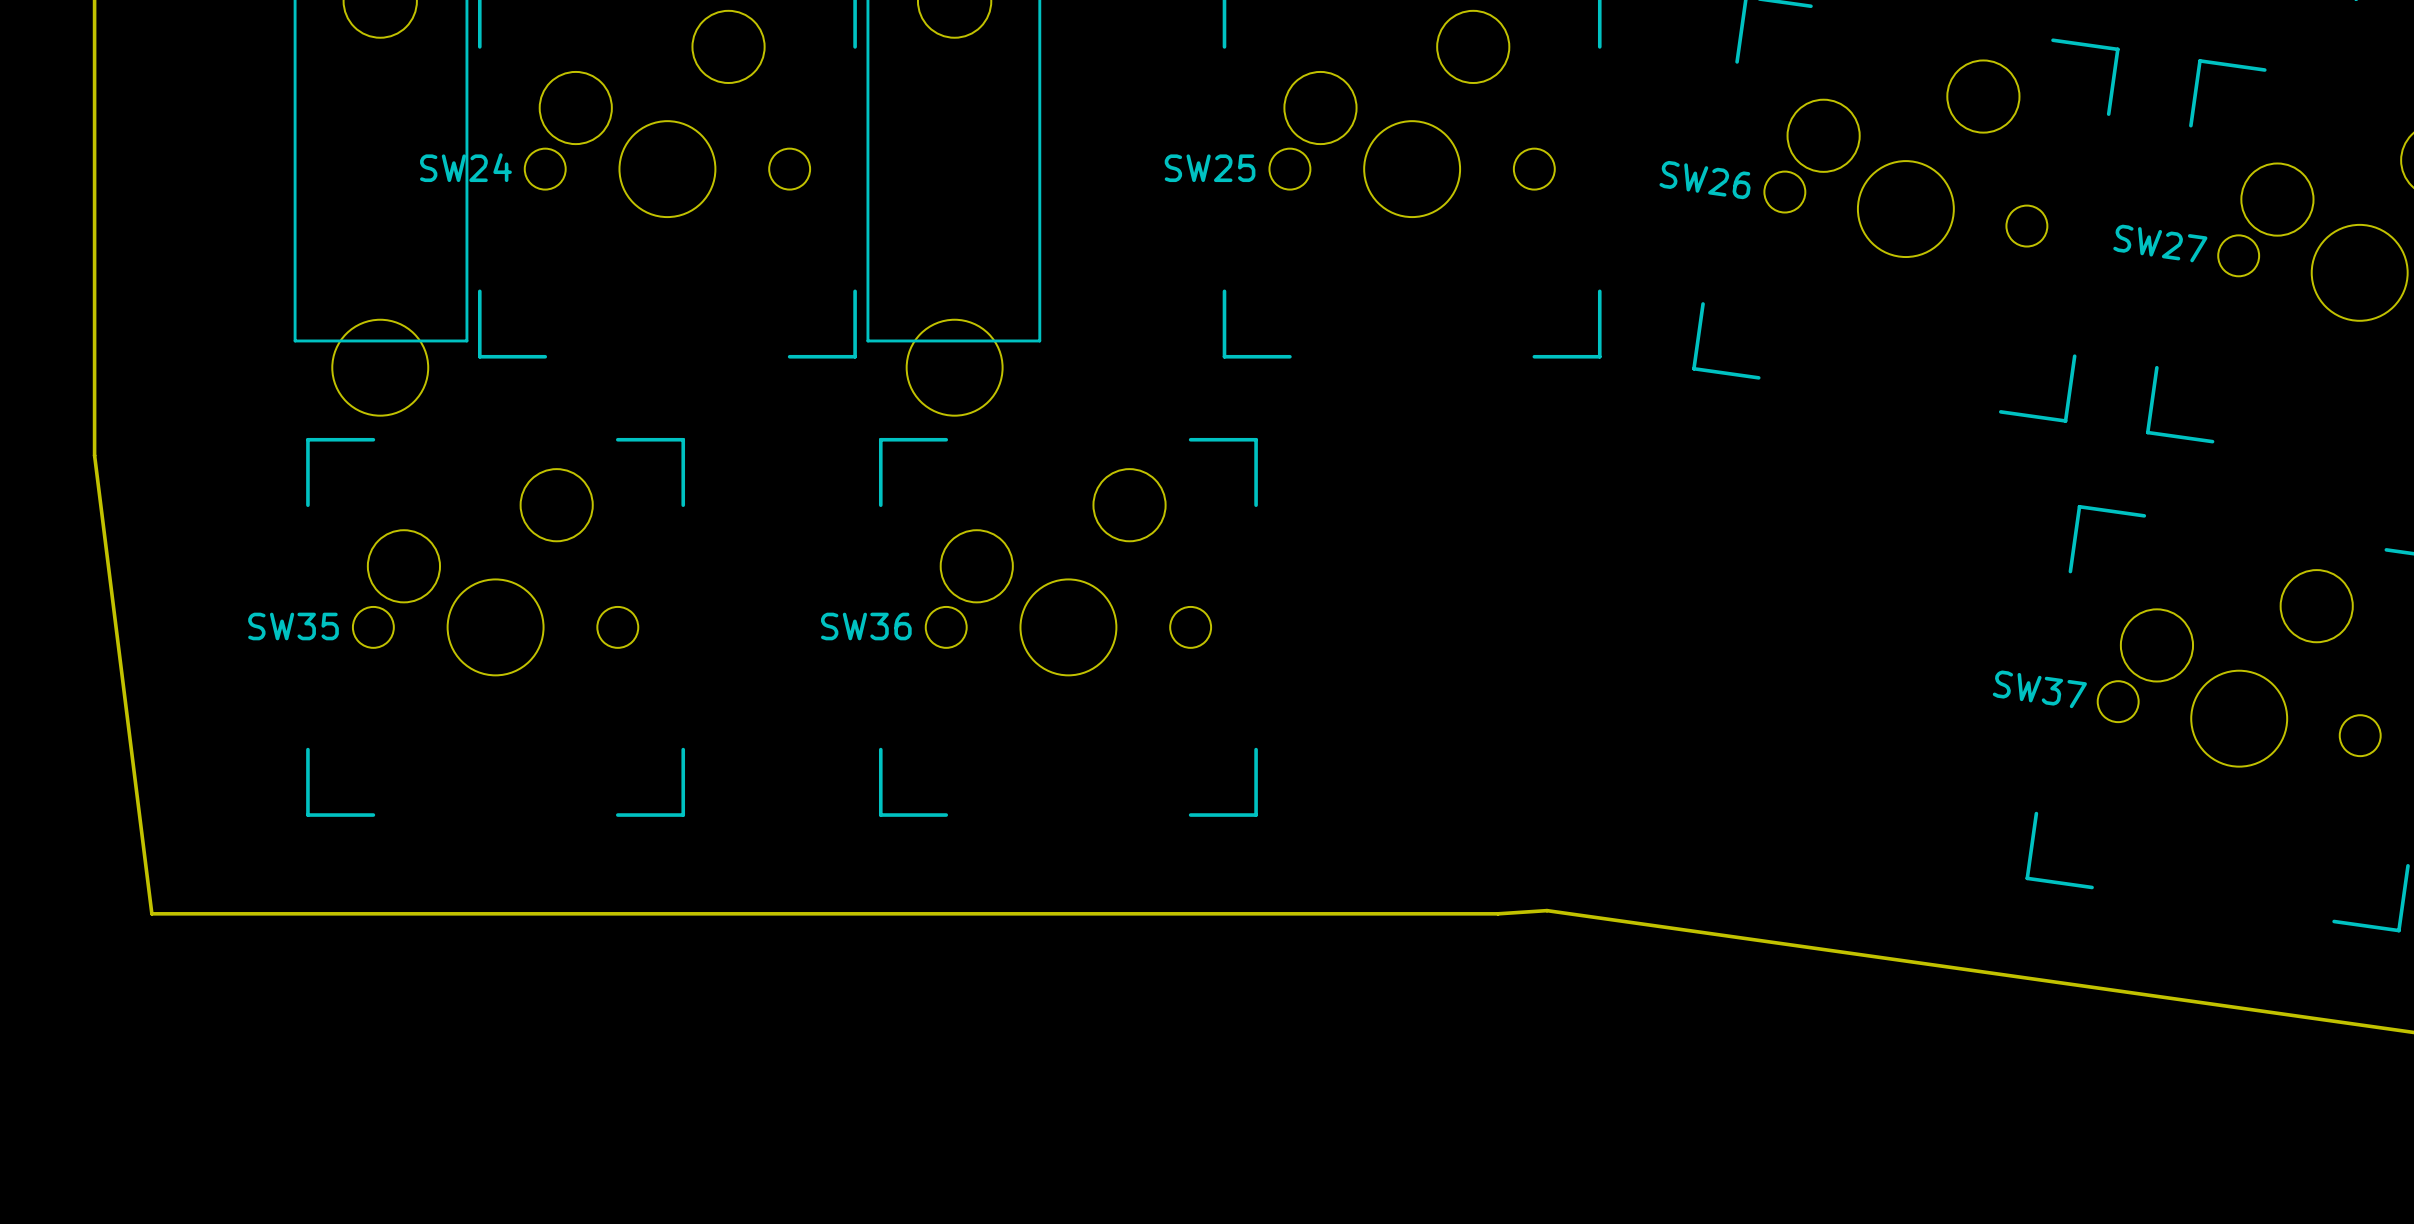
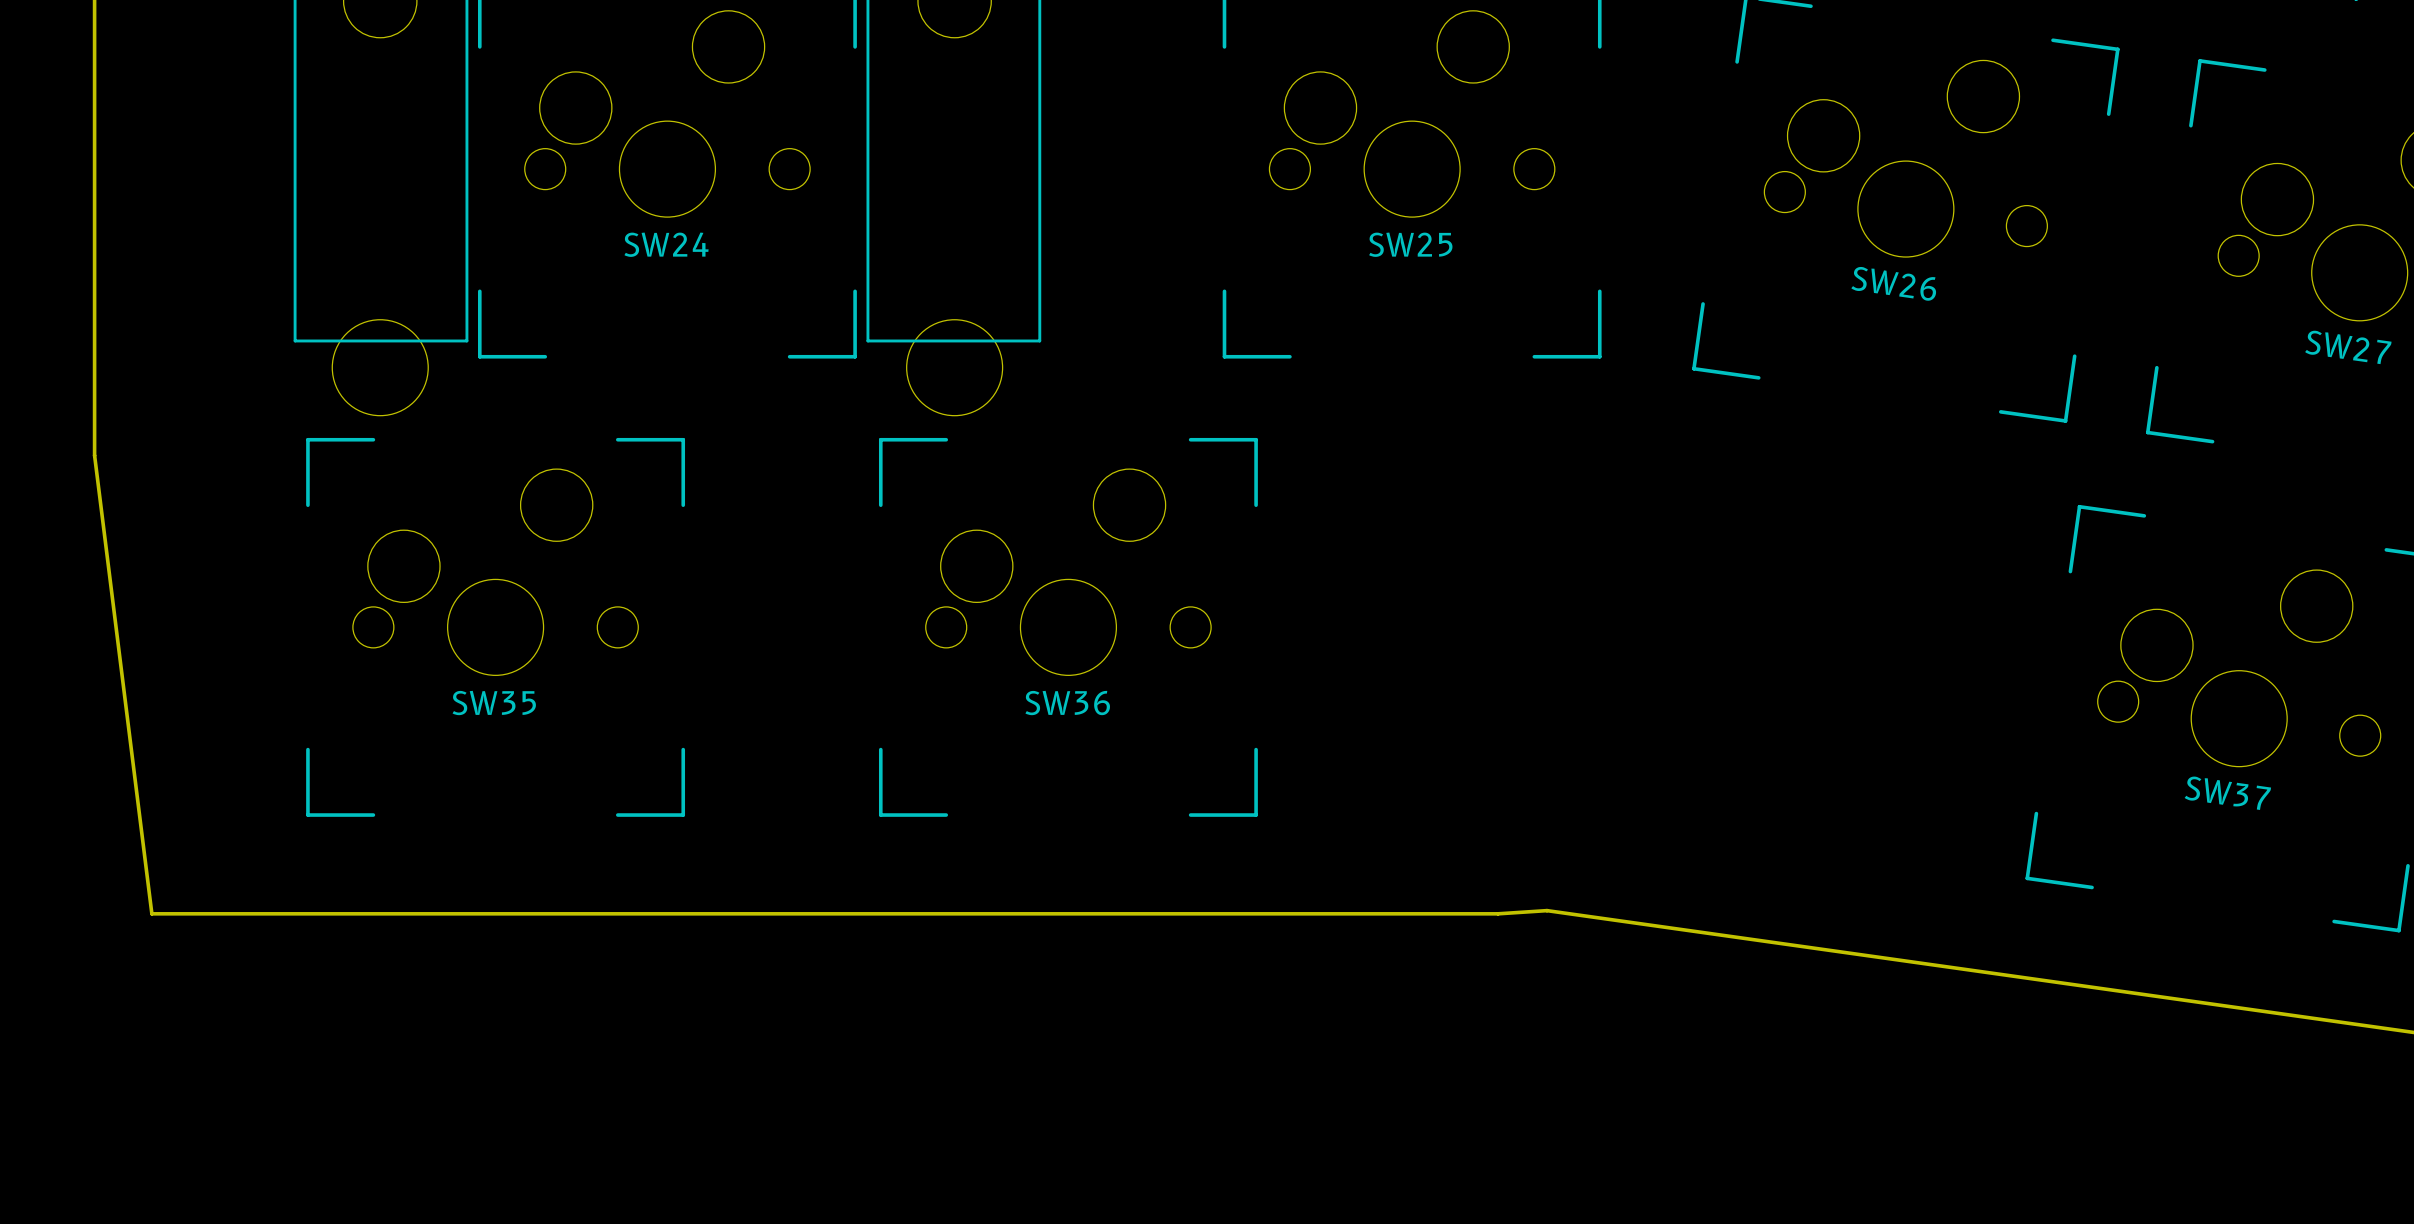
SW24 name position: SW24 (465, 167) -> SW24 (666, 244)
SW25 name position: SW25 (1210, 168) -> SW25 (1410, 244)
SW26 name position: SW26 (1705, 180) -> SW26 (1893, 283)
SW27 name position: SW27 (2160, 243) -> SW27 (2348, 347)
SW35 name position: SW35 (293, 626) -> SW35 (494, 703)
SW36 name position: SW36 (866, 626) -> SW36 (1067, 703)
SW37 name position: SW37 (2039, 689) -> SW37 (2227, 793)

